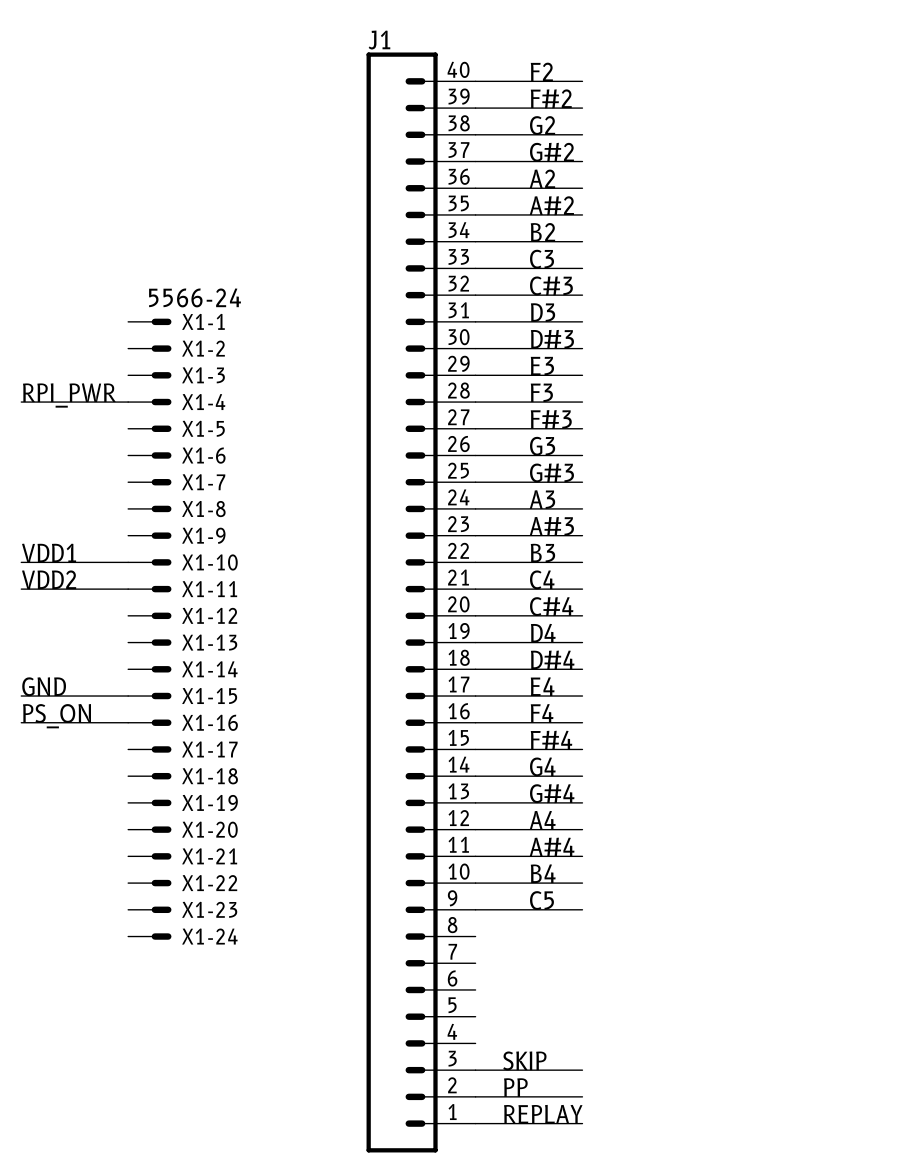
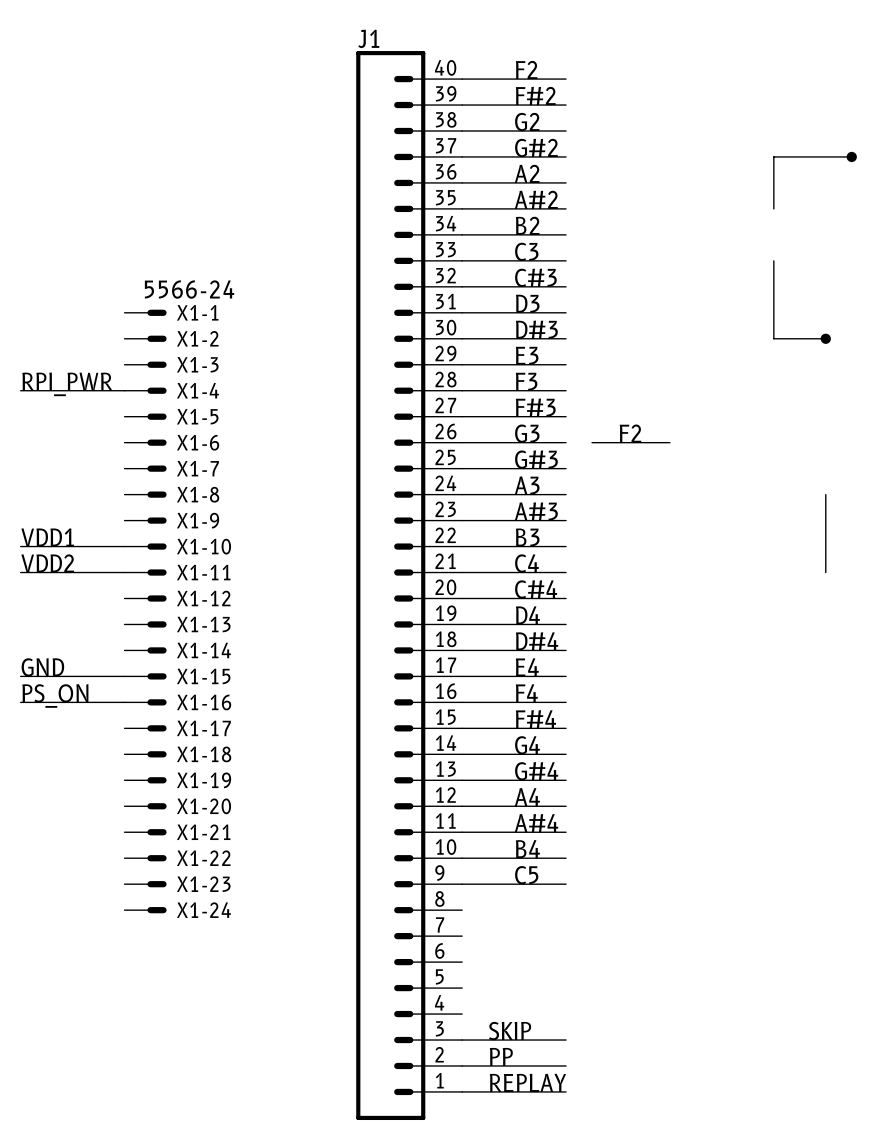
wire: none -> (851, 156) (773, 156) (773, 208)
junction: none -> (851, 156)
wire: none -> (773, 260) (773, 338) (825, 338)
junction: none -> (825, 338)
label: none -> F2 (630, 433)
wire: none -> (592, 442) (669, 442)
wire: none -> (825, 494) (825, 572)

